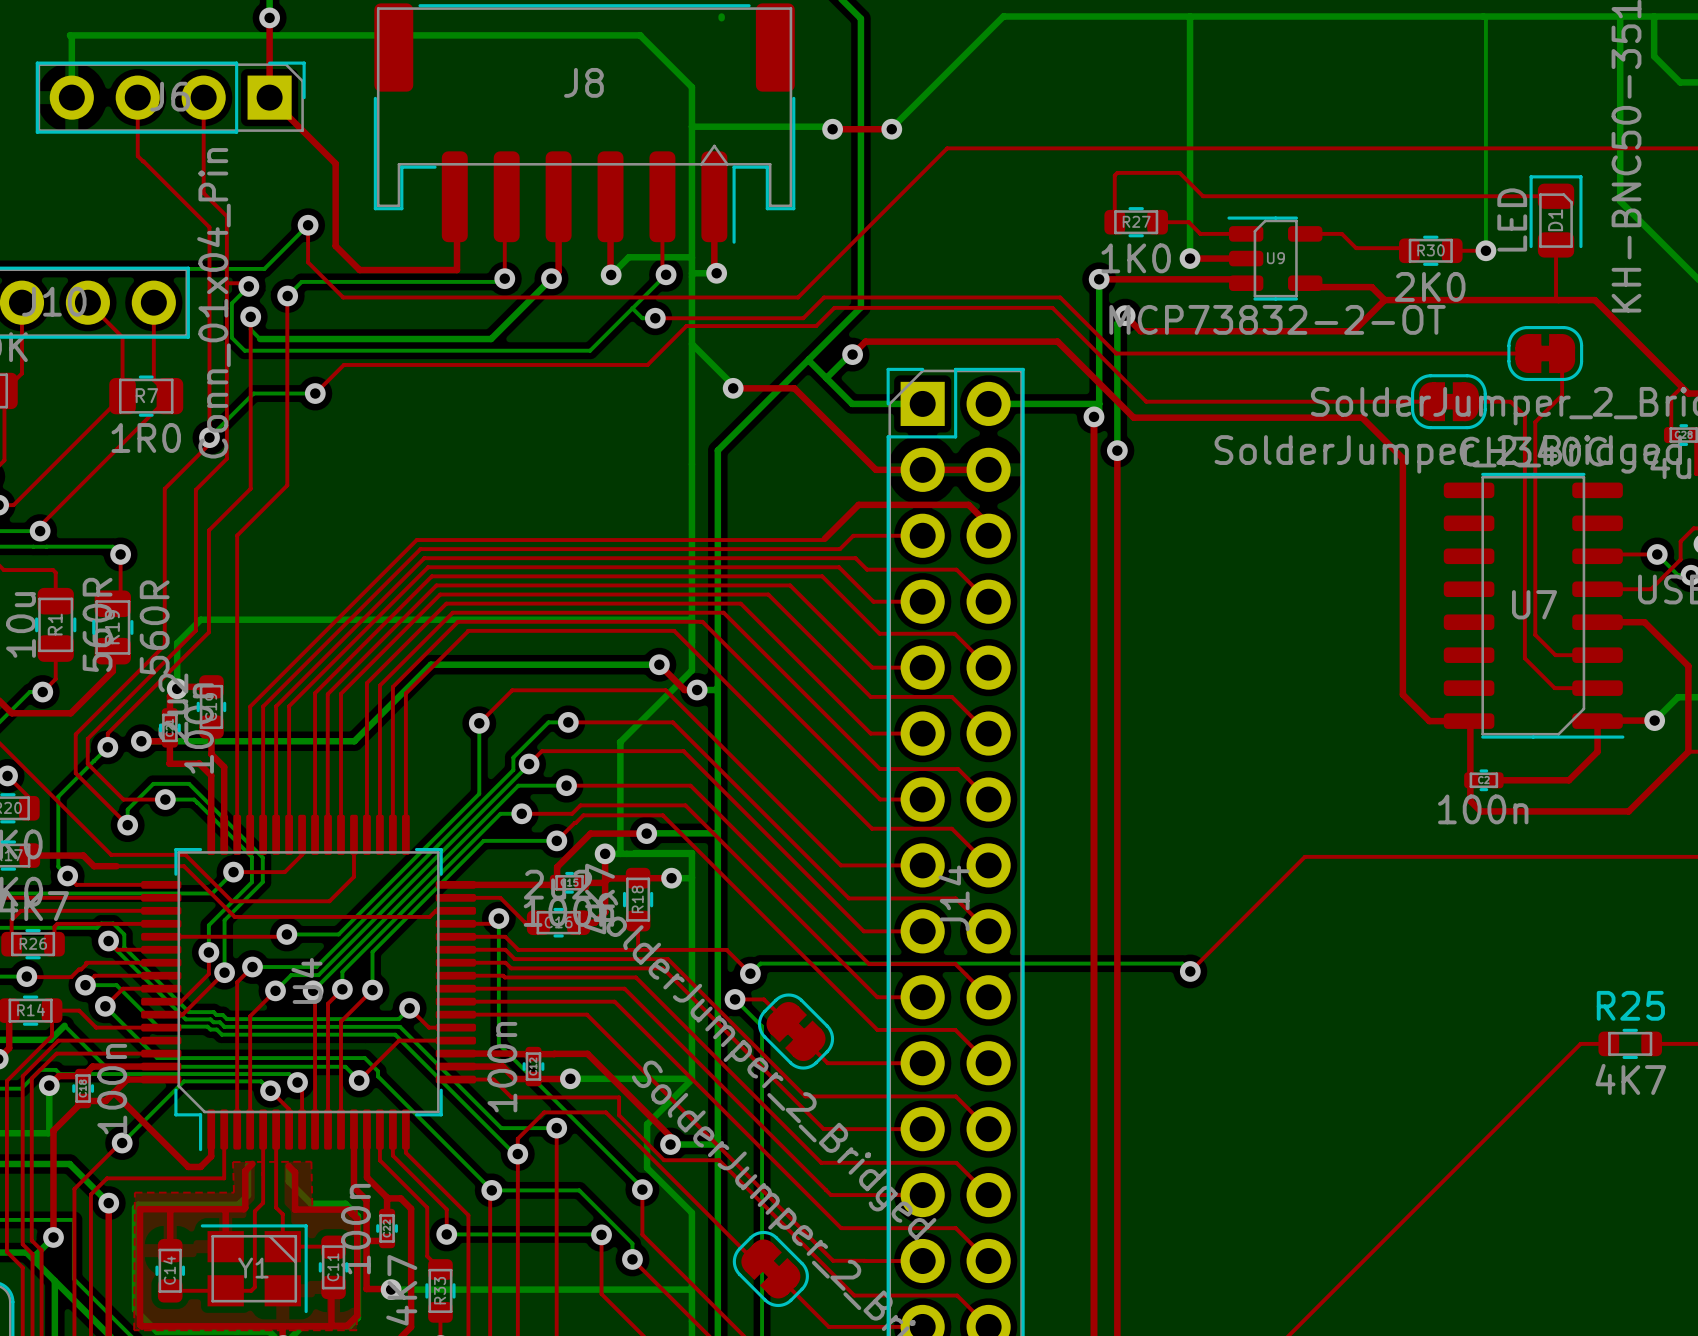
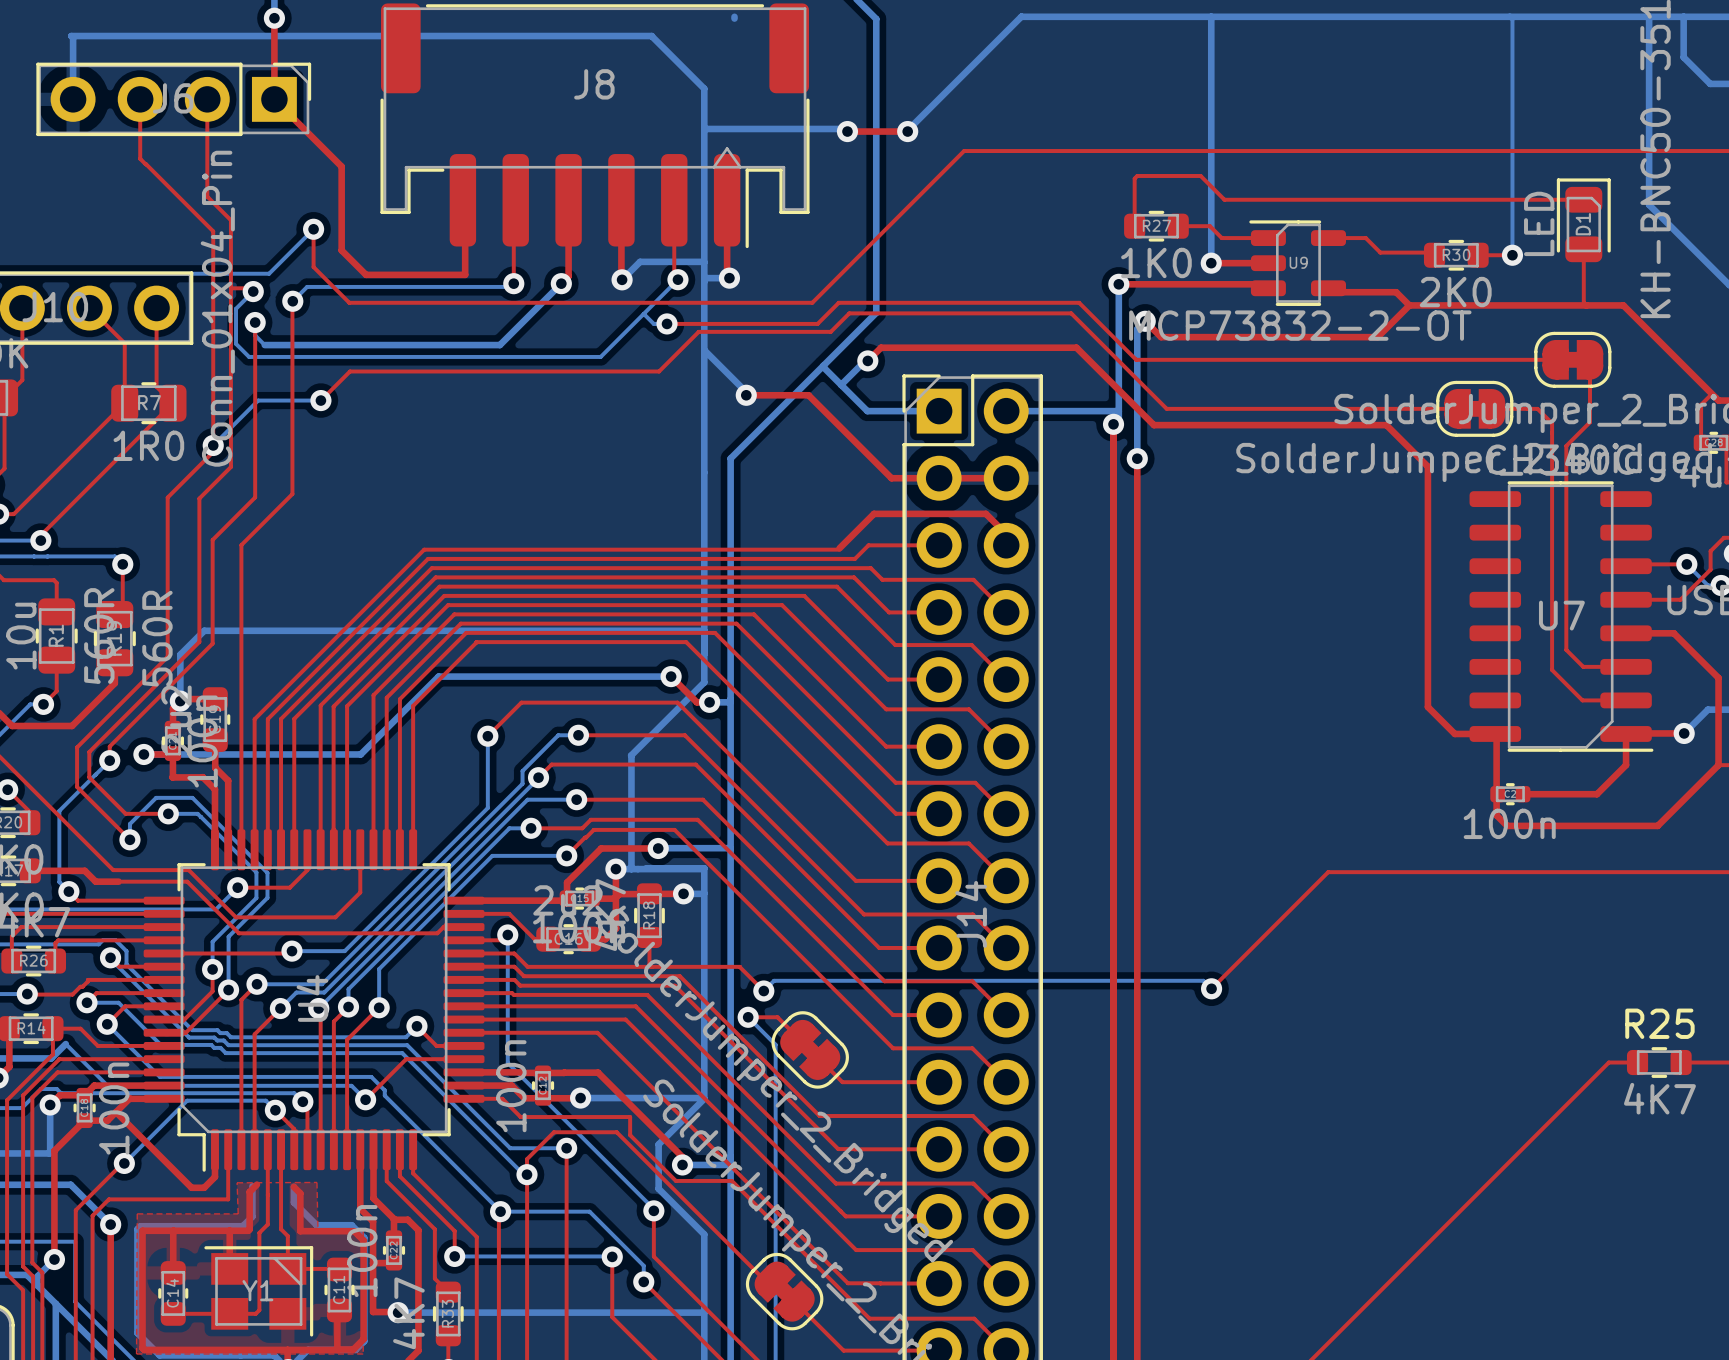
top track: (1562, 395) (1535, 422) (1535, 634) (1538, 638) -> (1590, 402) (1590, 422) (1566, 445) (1566, 649)

